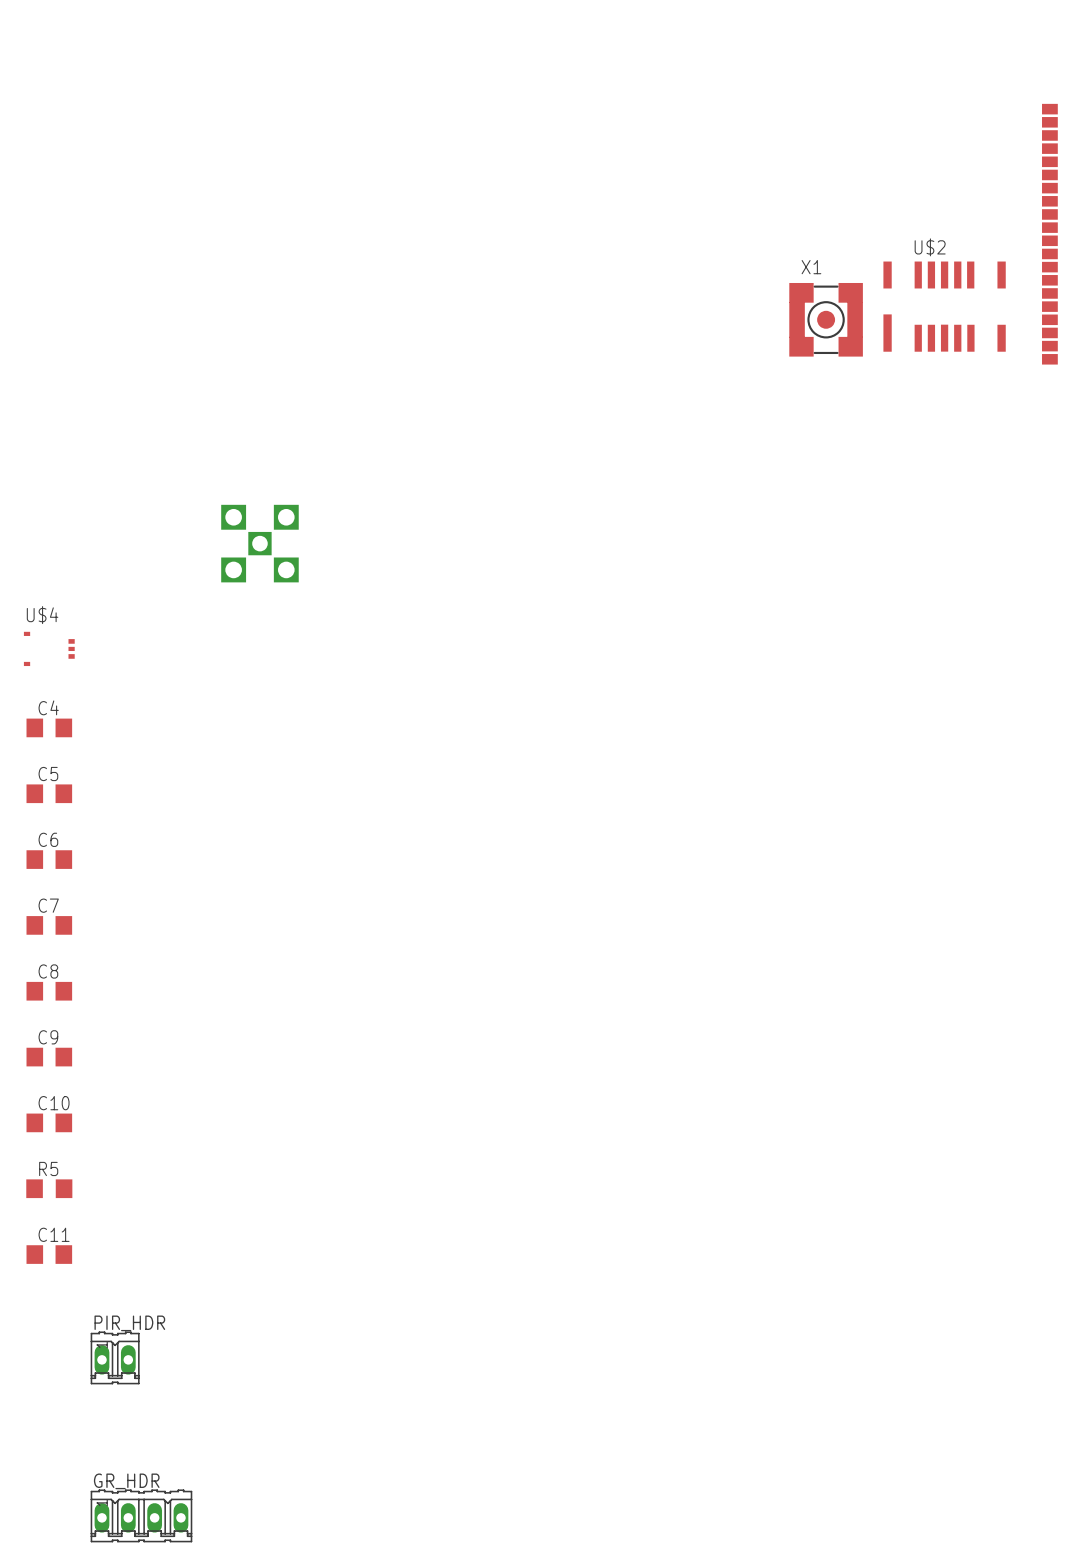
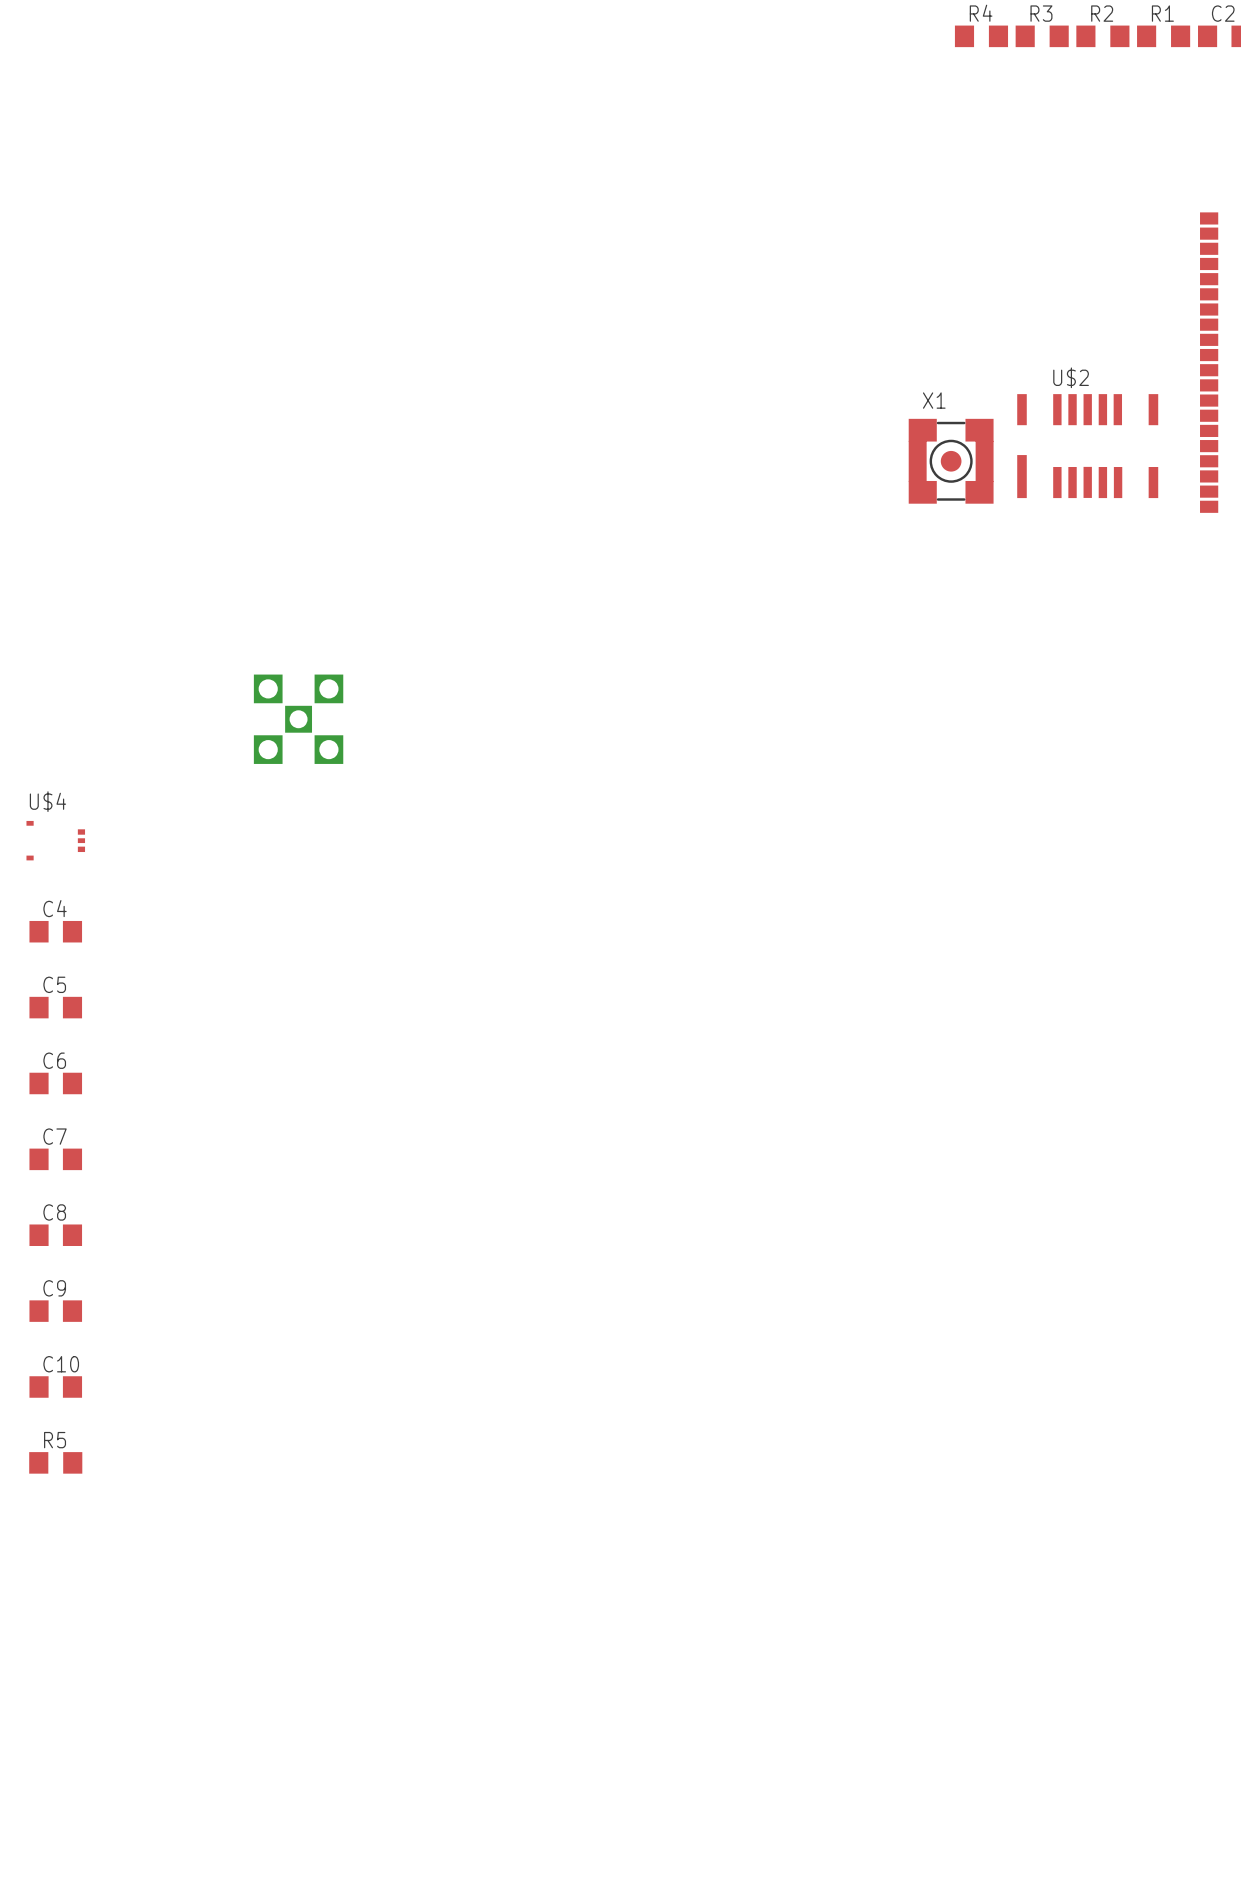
C11: (49, 1254) -> none
PIR_HDR: (115, 1357) -> none
GR_HDR: (141, 1515) -> none

